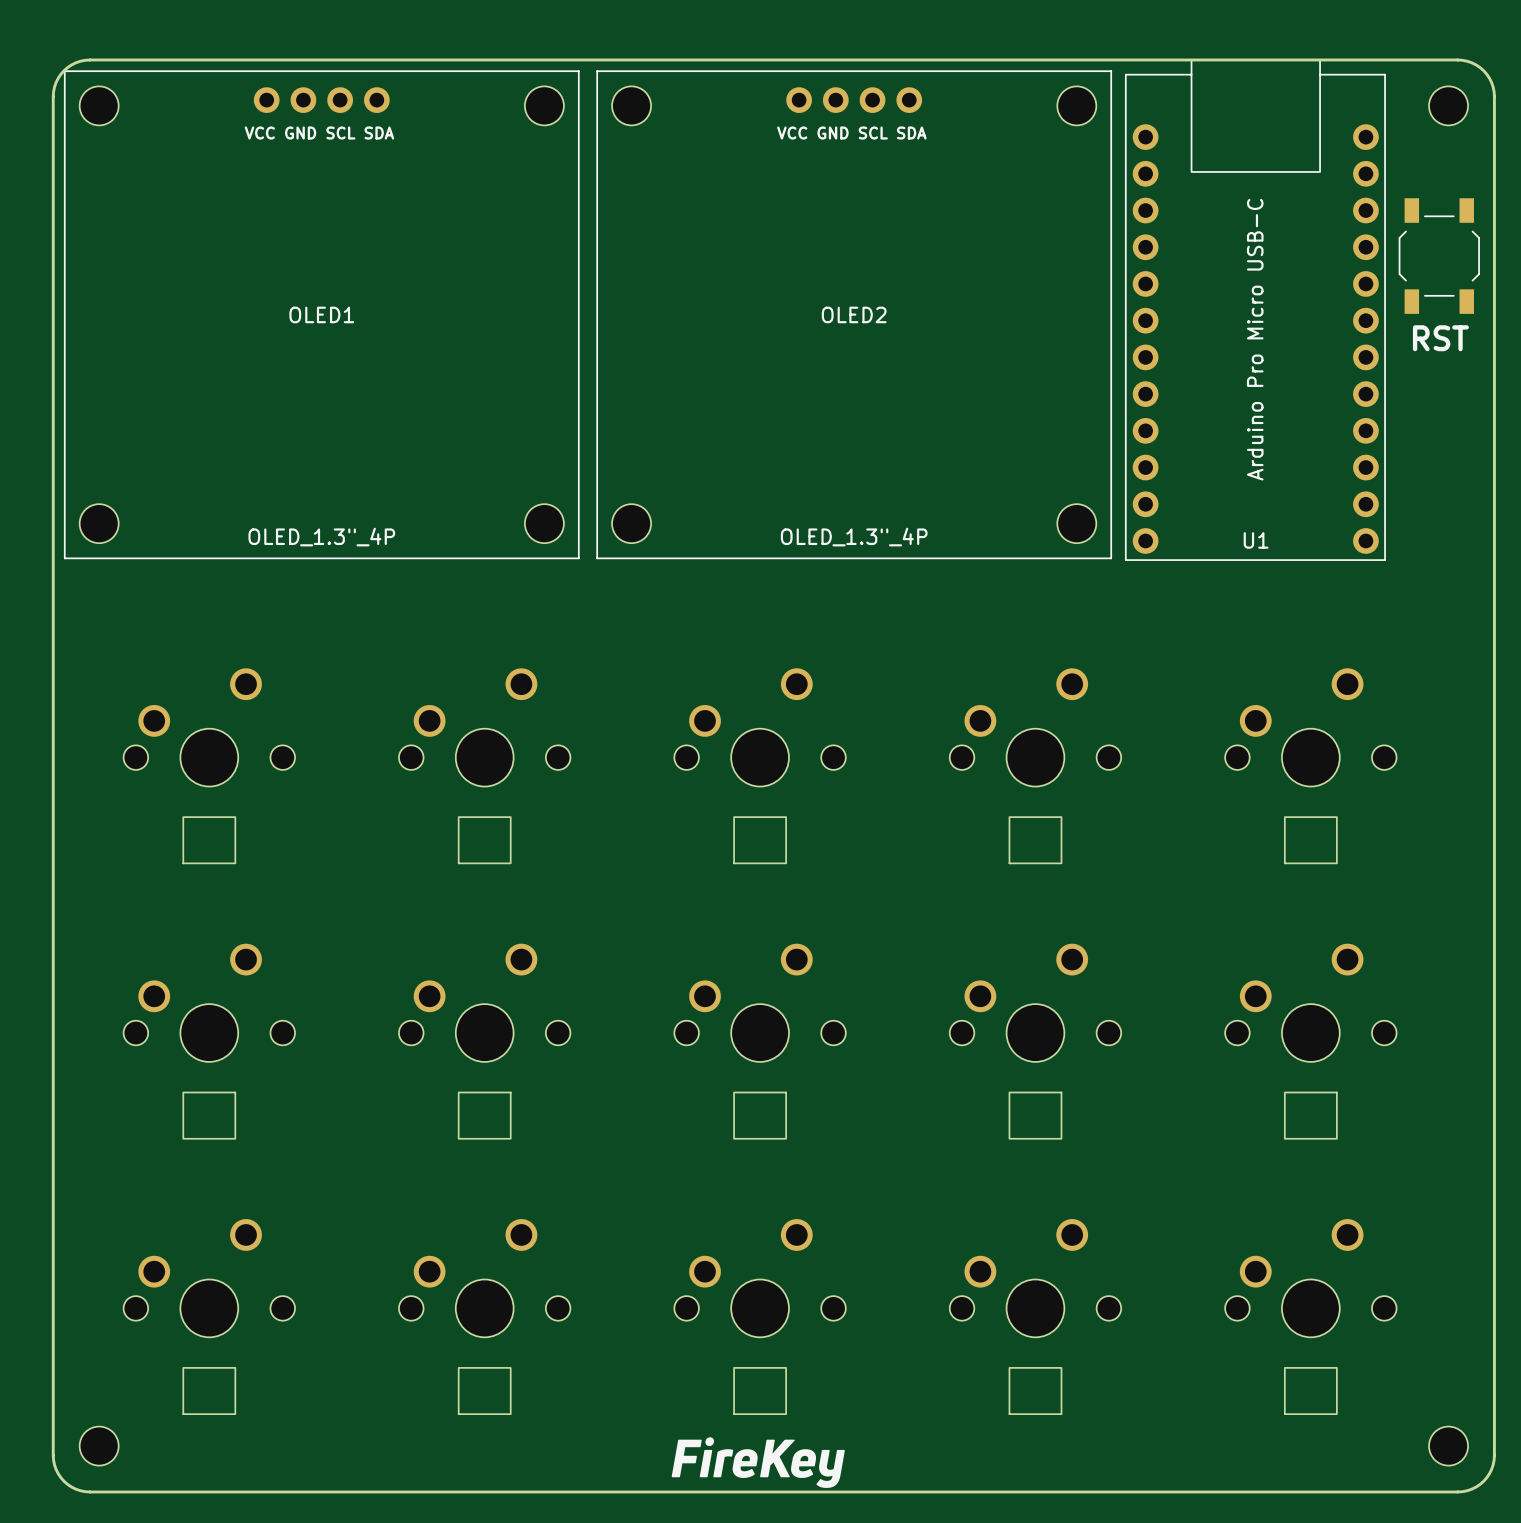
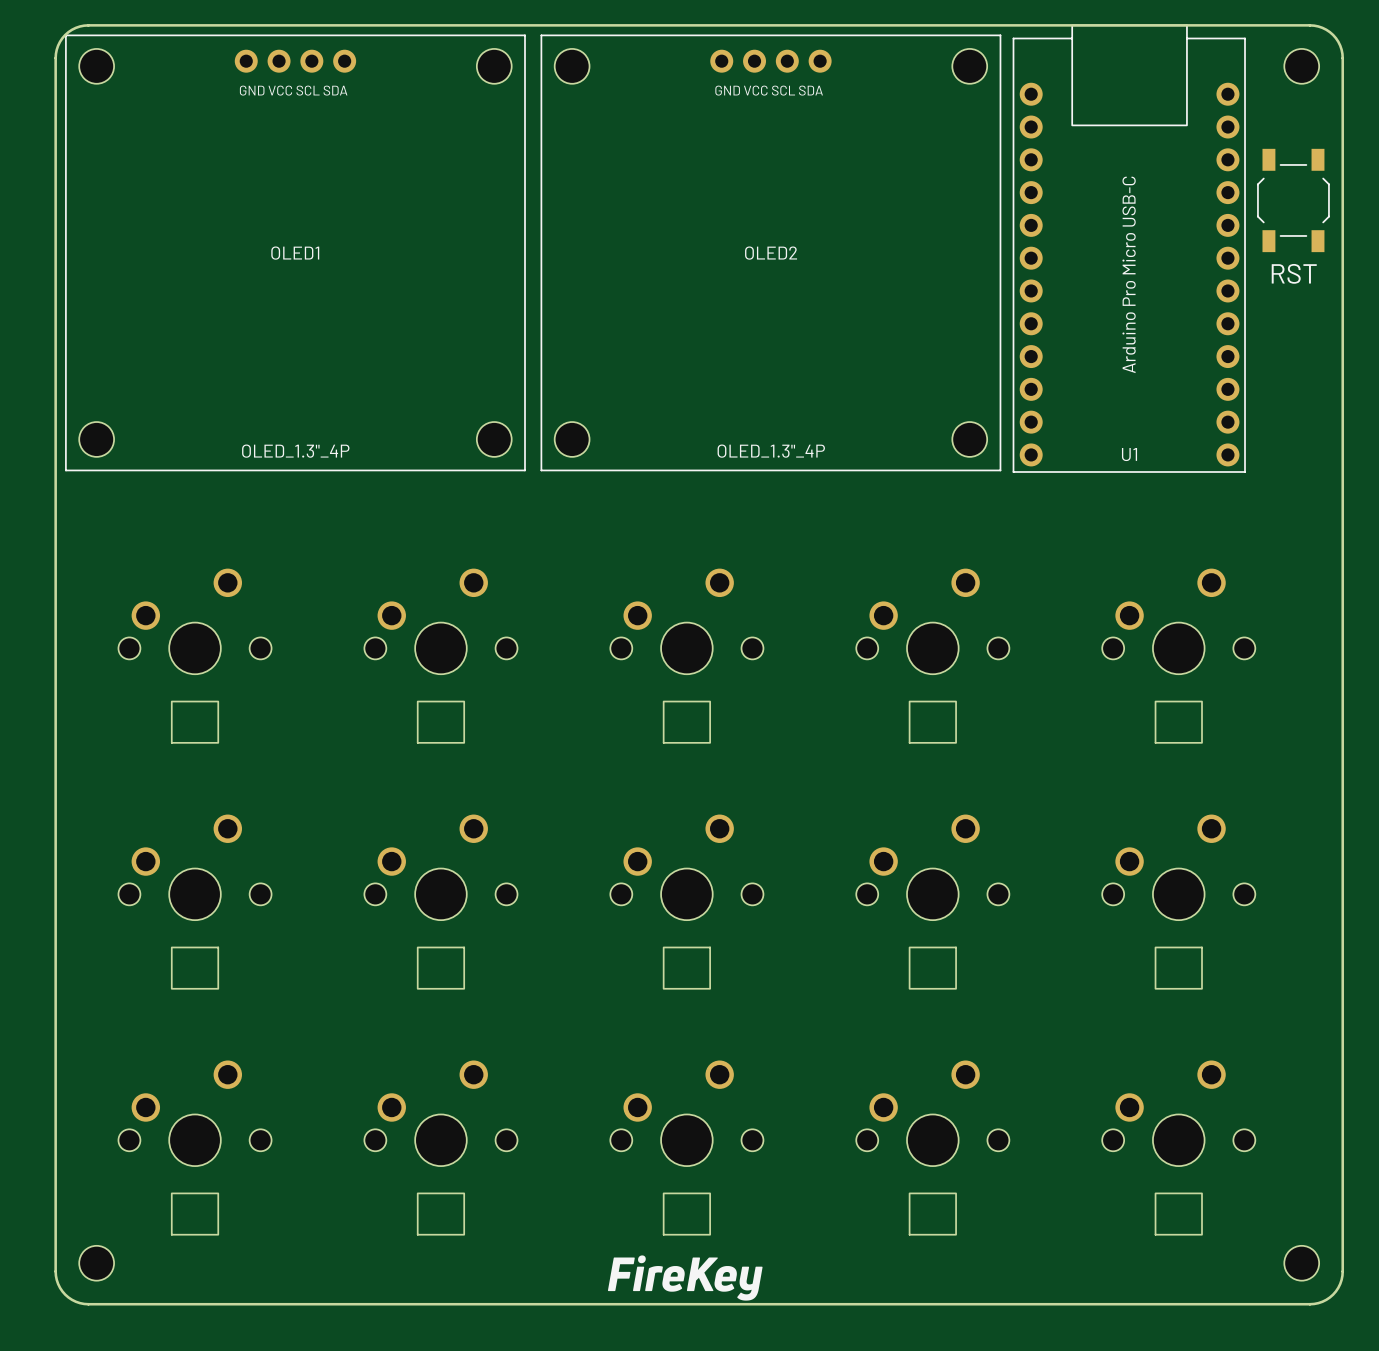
text: VCC GND SCL SDA (319, 133) -> GND VCC SCL SDA (293, 90)
text: VCC GND SCL SDA (851, 133) -> GND VCC SCL SDA (769, 90)

